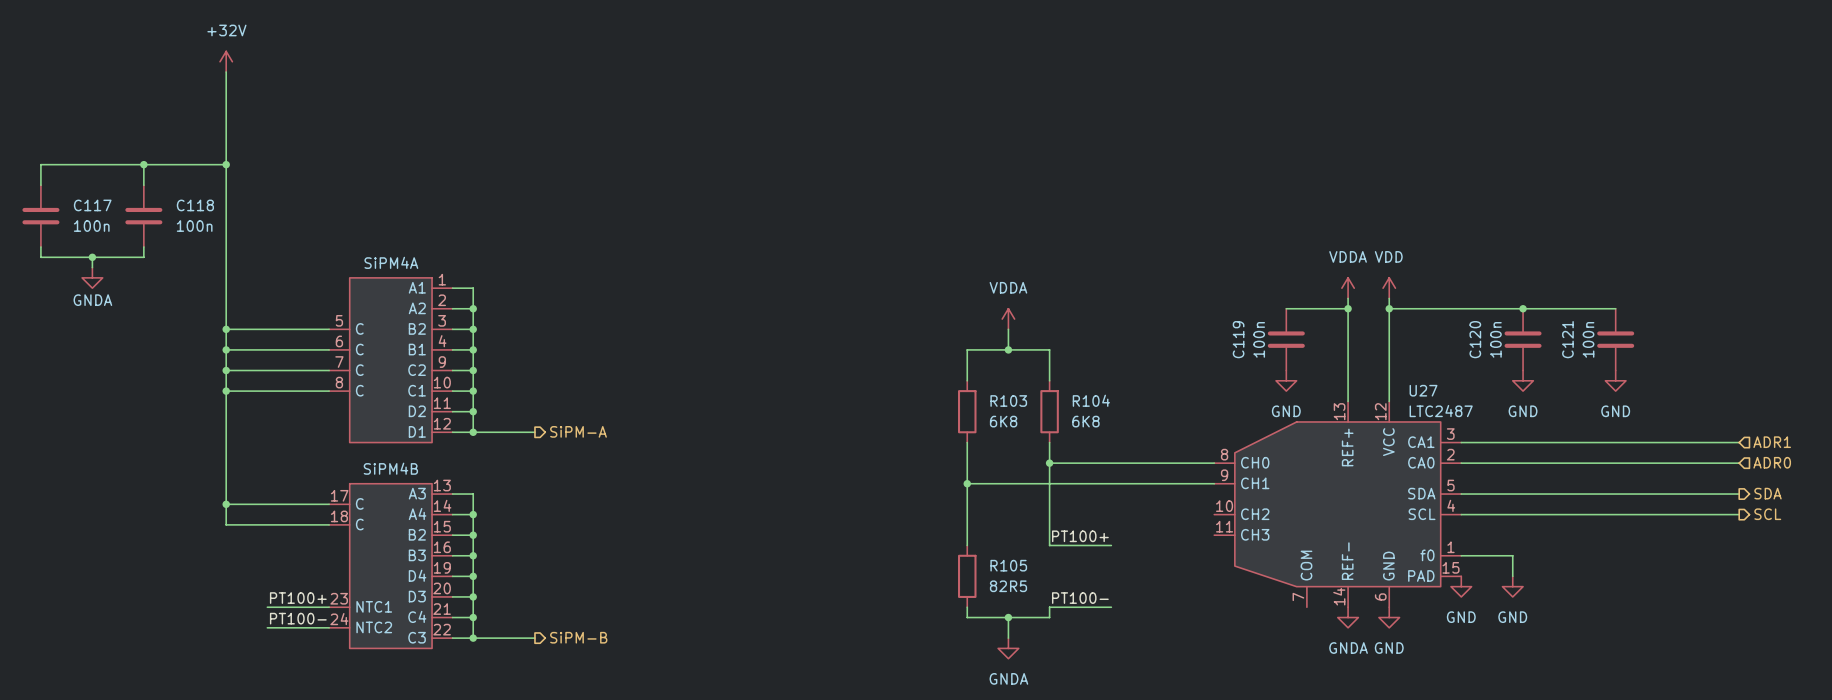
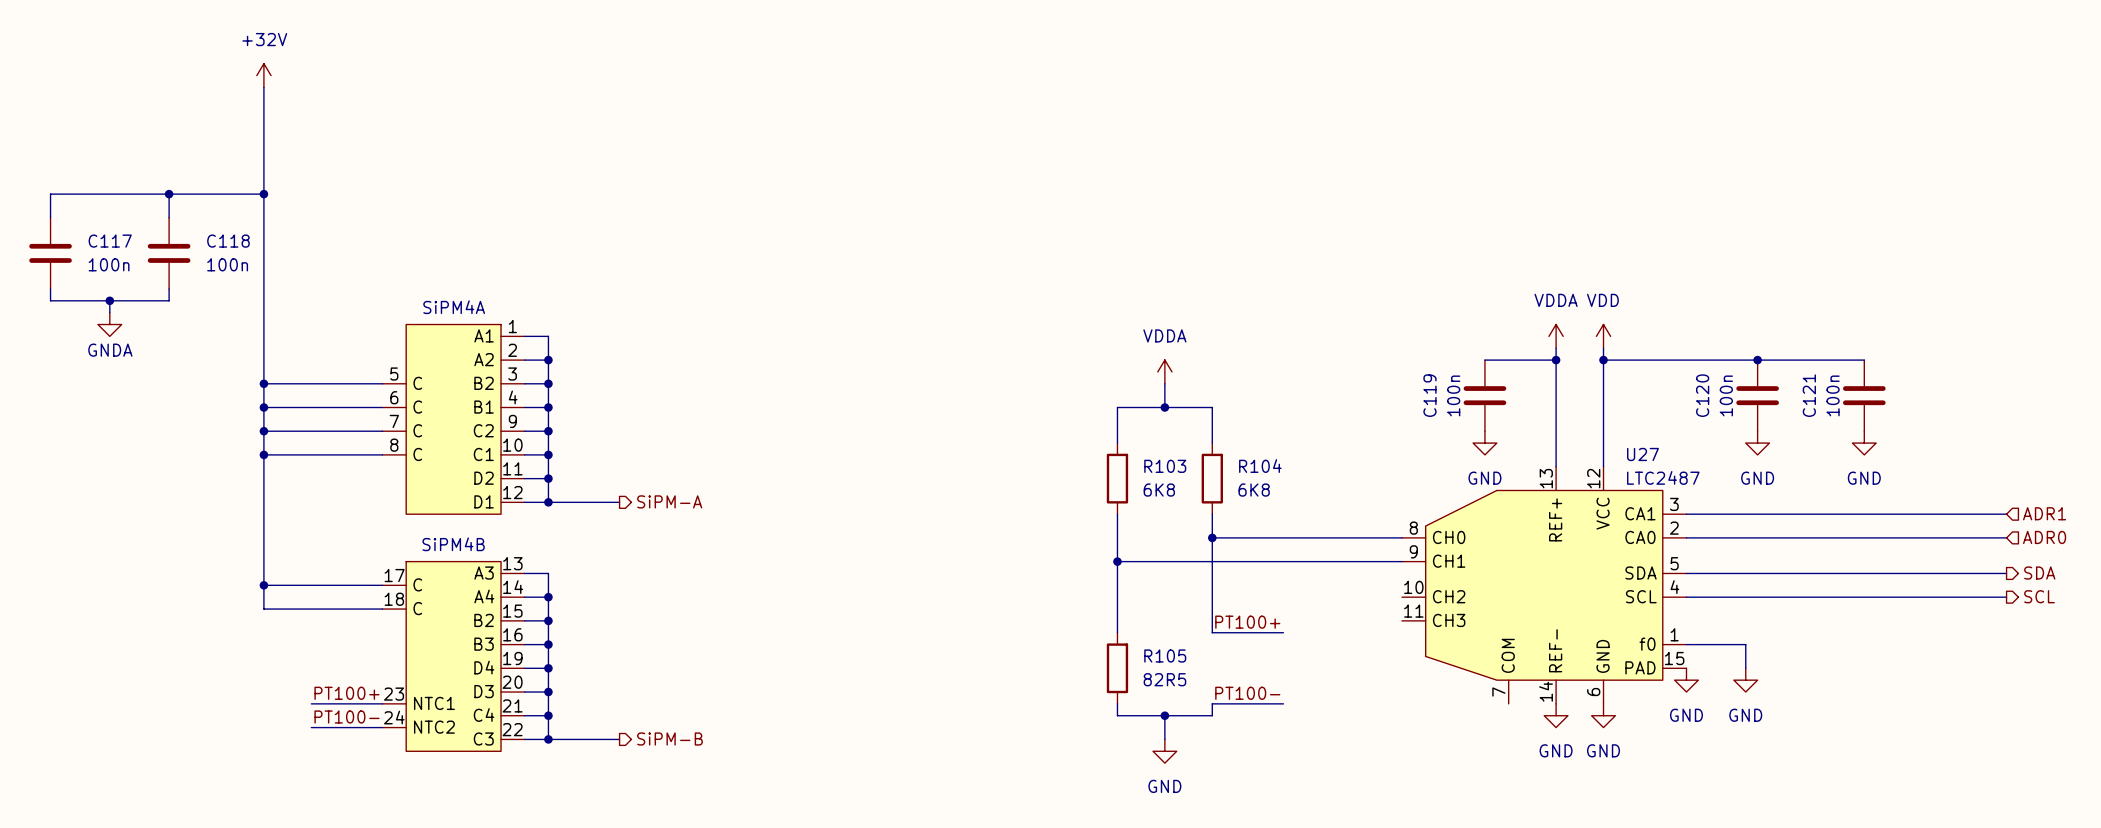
power symbol: GNDA (1348, 617) -> GND (1556, 715)
power symbol: GNDA (1008, 648) -> GND (1164, 751)

